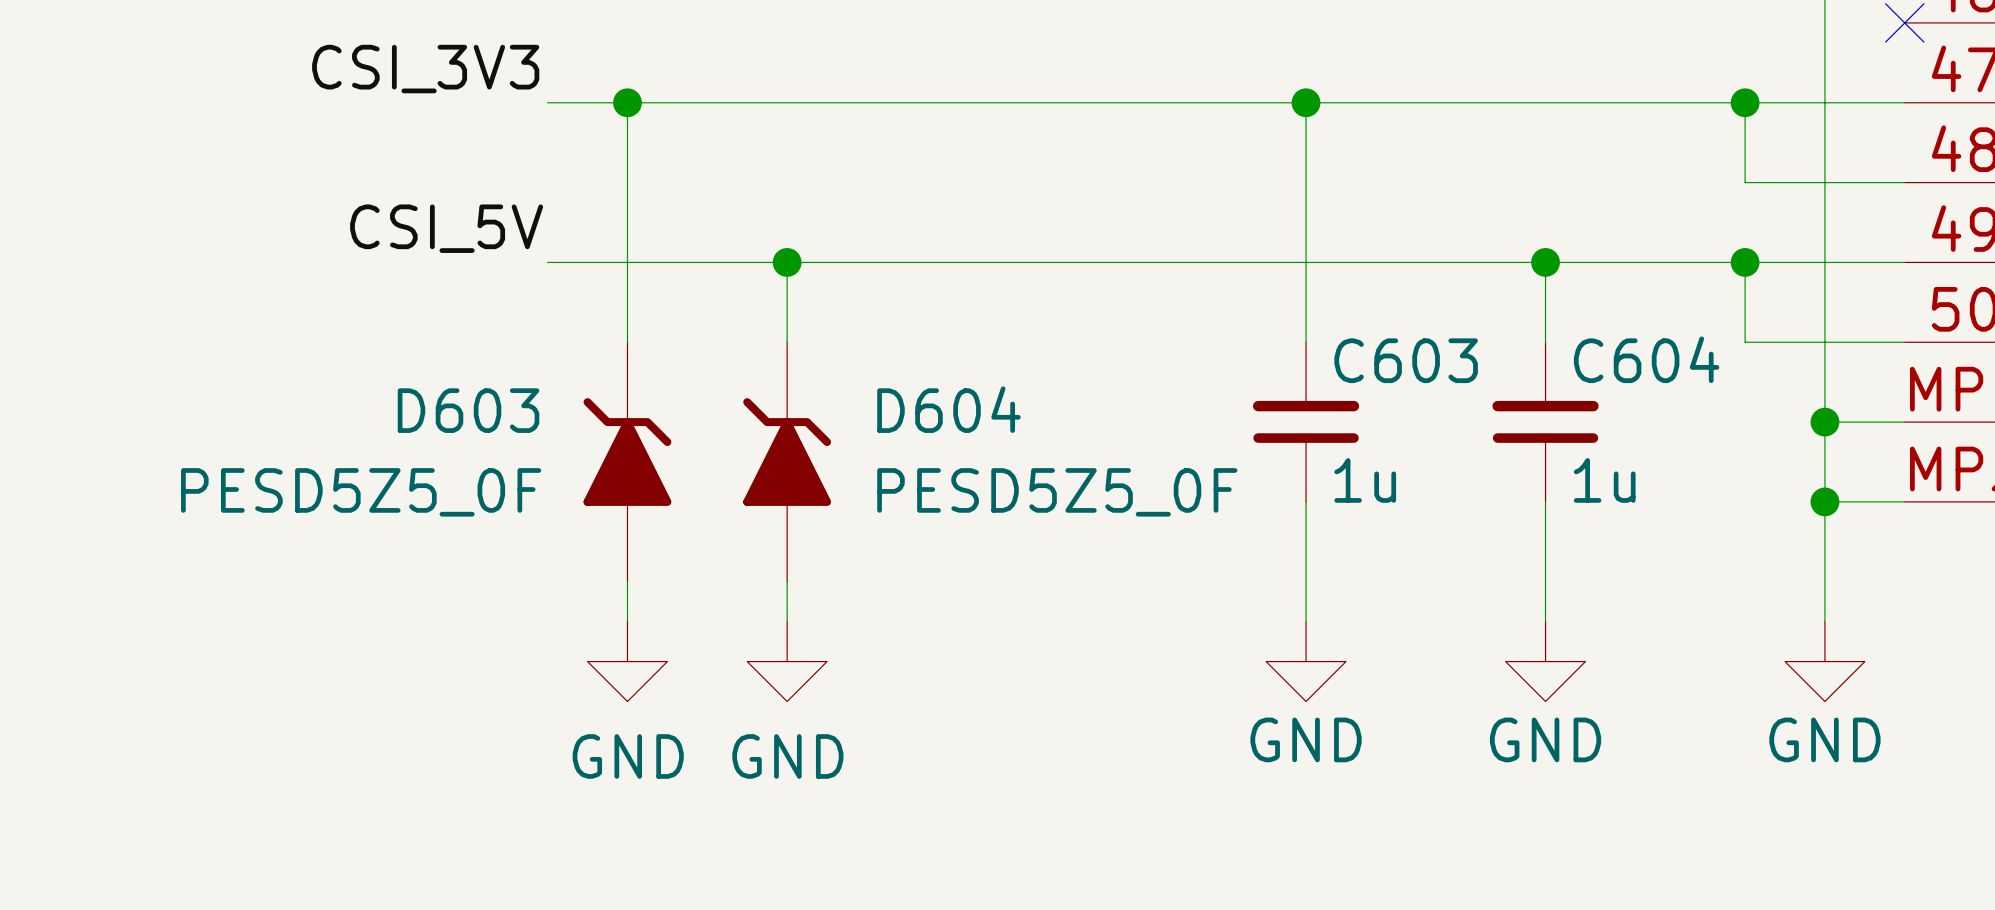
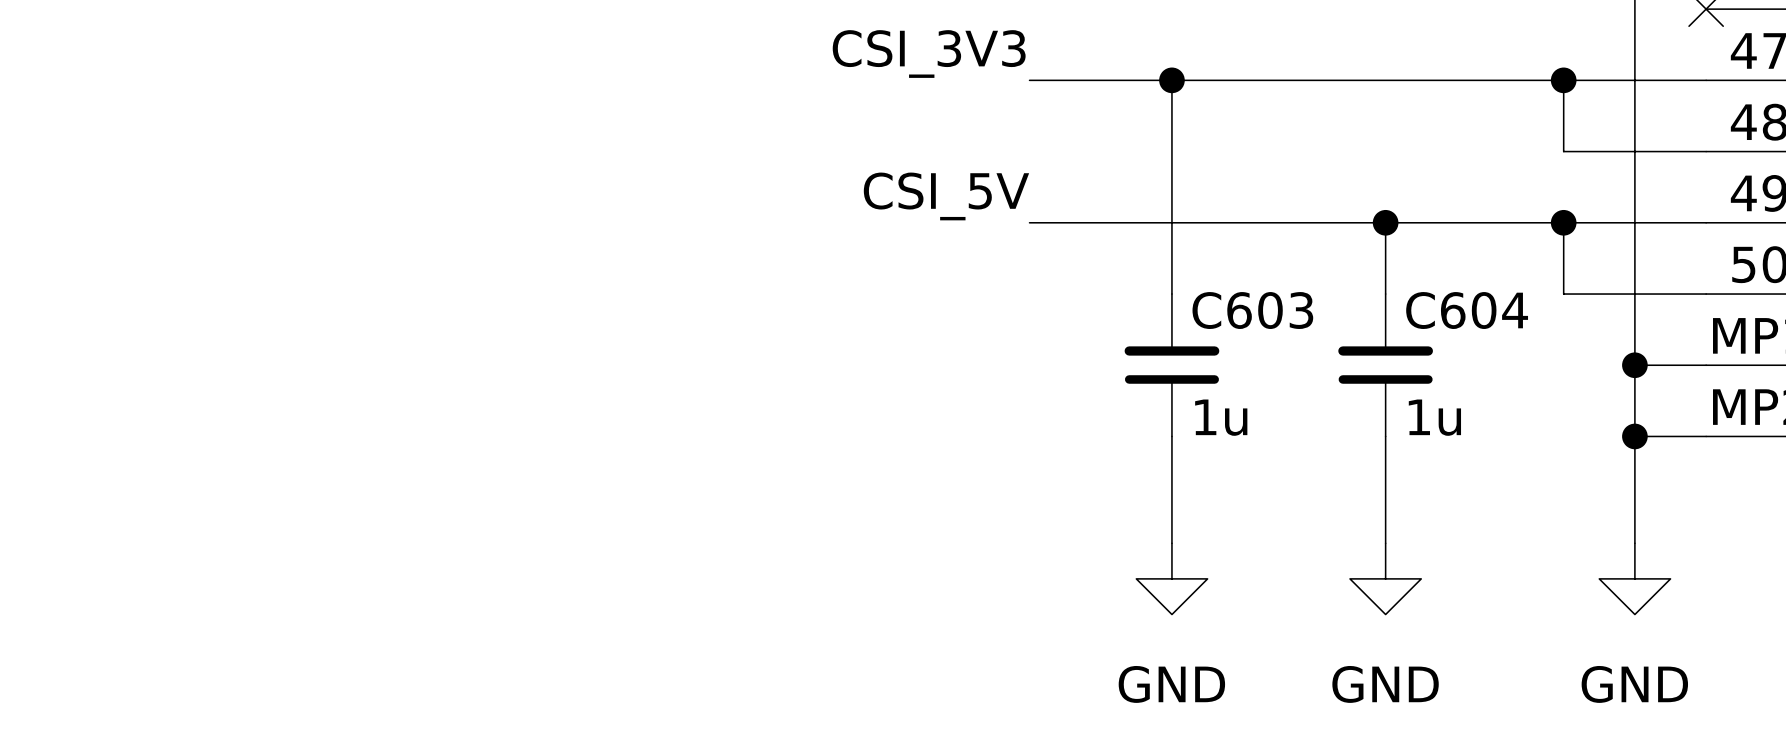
label position: CSI_3V3 (425, 69) -> CSI_3V3 (929, 54)
wire: (547, 102) (1146, 102) -> none
wire: (627, 102) (627, 342) -> none
junction: (627, 102) -> none
label position: CSI_5V (446, 228) -> CSI_5V (946, 196)
wire: (547, 262) (1146, 262) -> none
wire: (787, 262) (787, 342) -> none
junction: (787, 262) -> none
D603: PESD5Z5_0F (627, 462) -> none
D604: PESD5Z5_0F (787, 462) -> none
wire: (627, 581) (627, 621) -> none
wire: (787, 581) (787, 621) -> none
power symbol: GND (627, 661) -> none
power symbol: GND (787, 661) -> none
power symbol text position: GND (1306, 739) -> GND (1171, 684)
power symbol text position: GND (1545, 739) -> GND (1385, 684)
power symbol text position: GND (1824, 739) -> GND (1634, 684)

